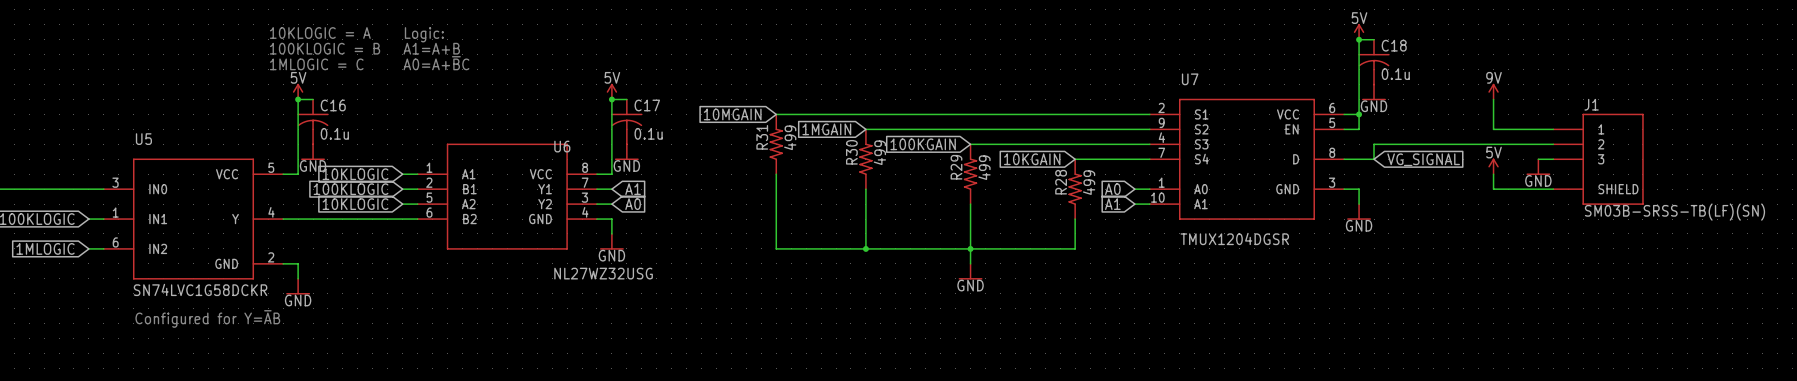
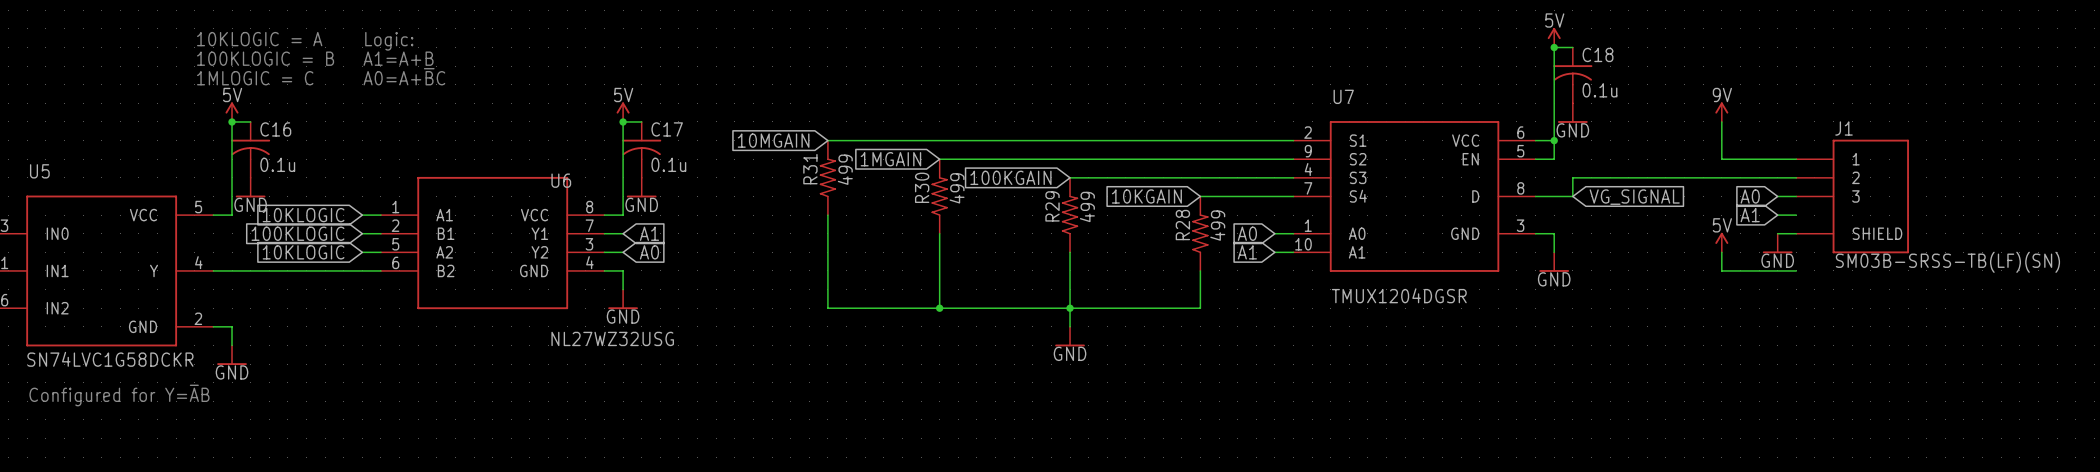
global label: none -> A0 (1750, 196)
power symbol position: 5V (1493, 166) -> 5V (1721, 242)
power symbol position: GND (1538, 167) -> GND (1777, 243)
wire: (1493, 174) (1493, 189) (1538, 189) -> none
global label: none -> A1 (1750, 215)
wire: none -> (1721, 252) (1721, 270) (1796, 270)

